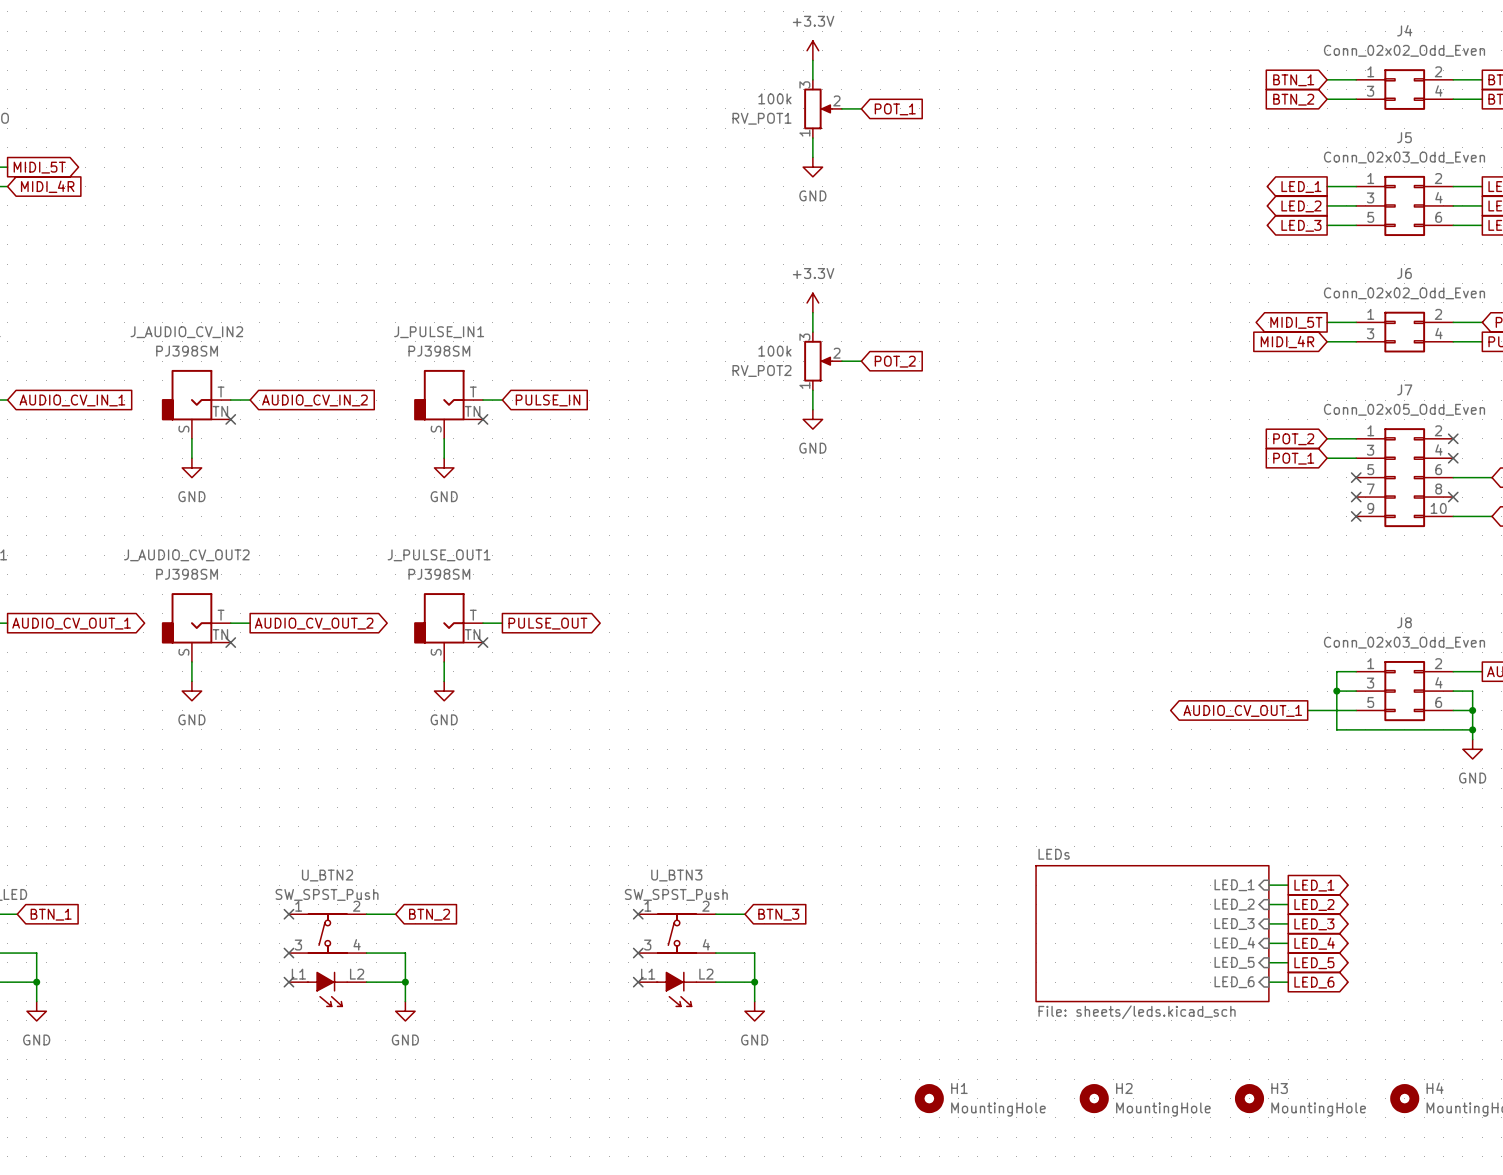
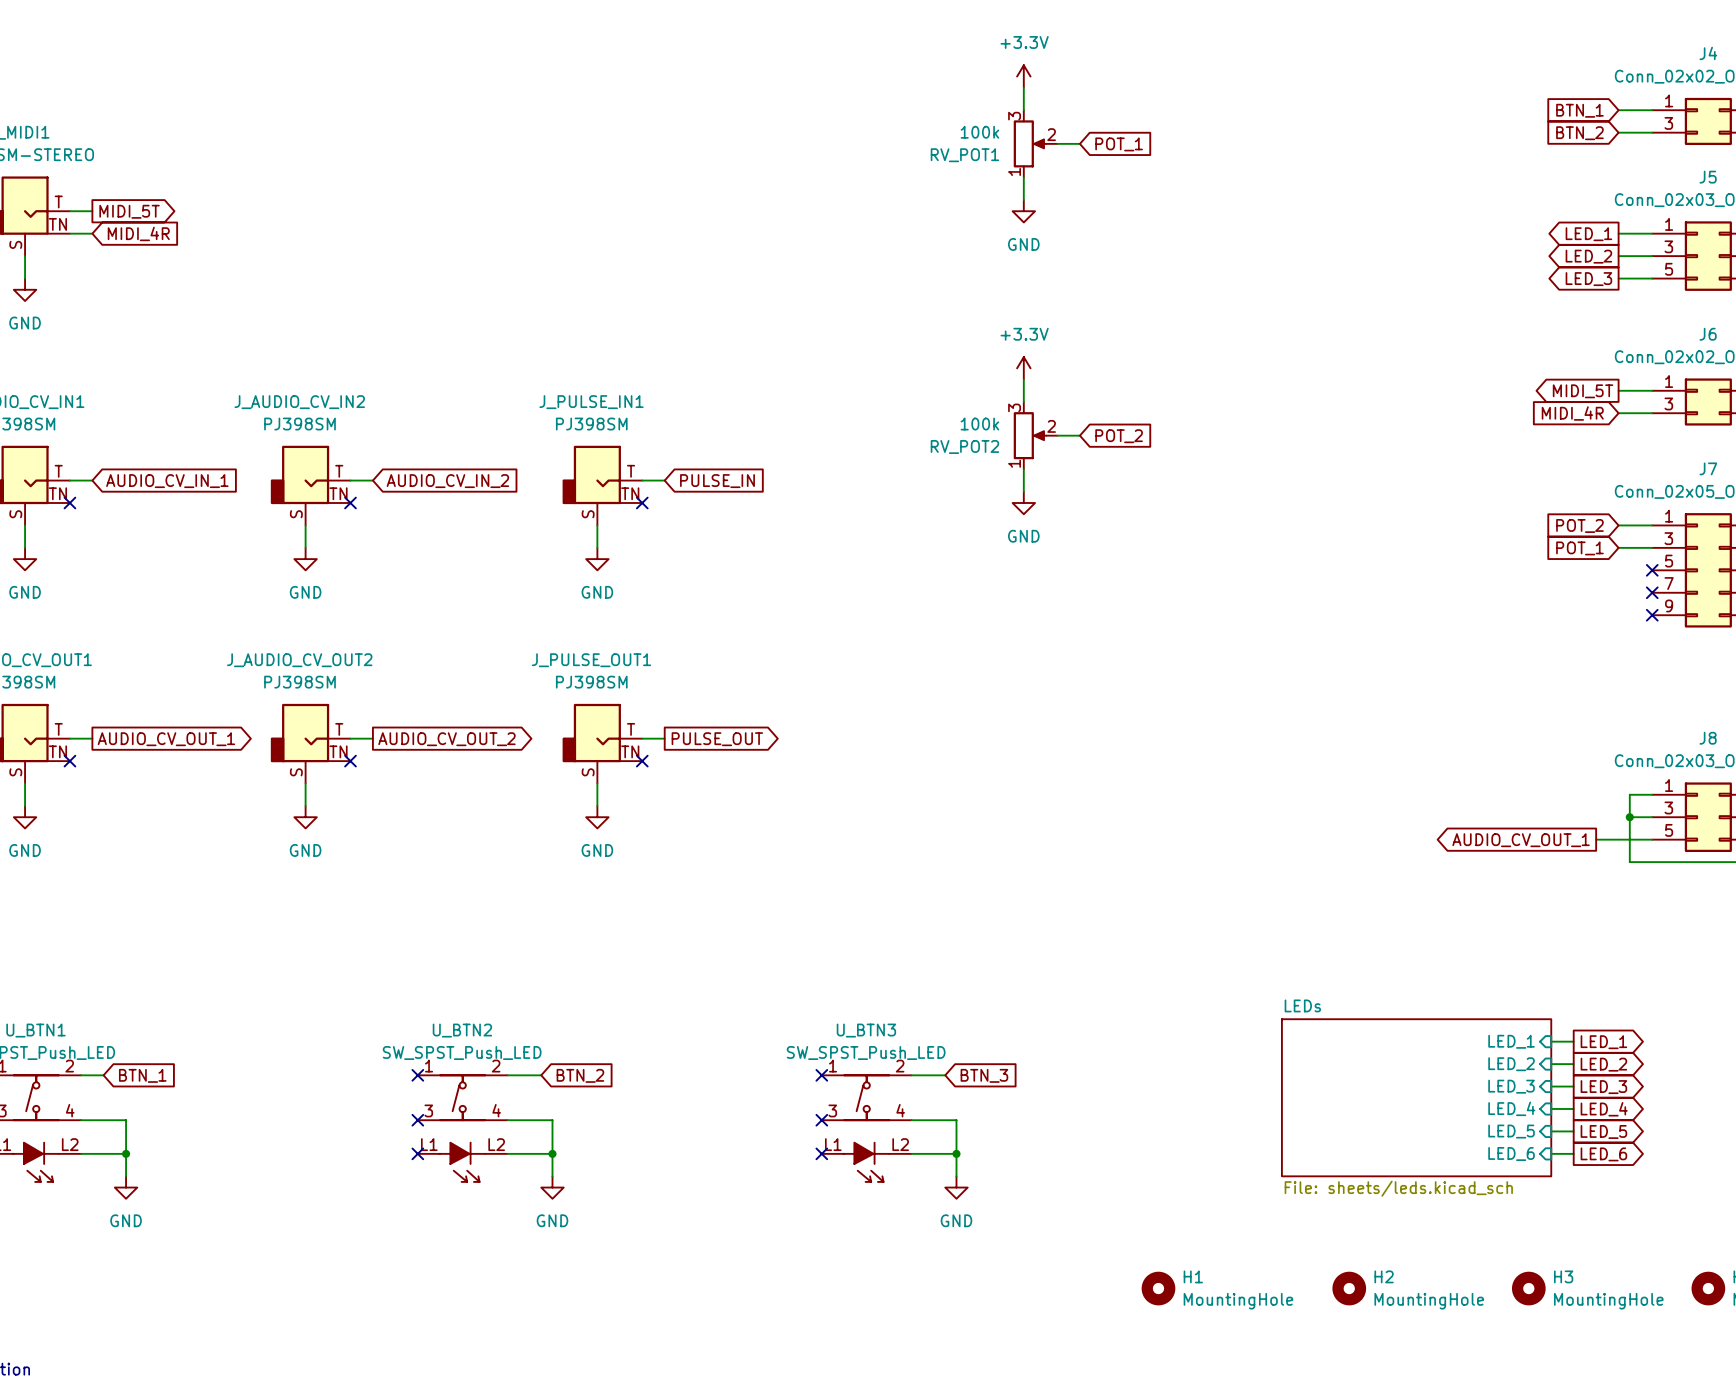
U_BTN2 value: SW_SPST_Push (327, 894) -> SW_SPST_Push_LED (462, 1053)
U_BTN3 value: SW_SPST_Push (676, 894) -> SW_SPST_Push_LED (866, 1053)

